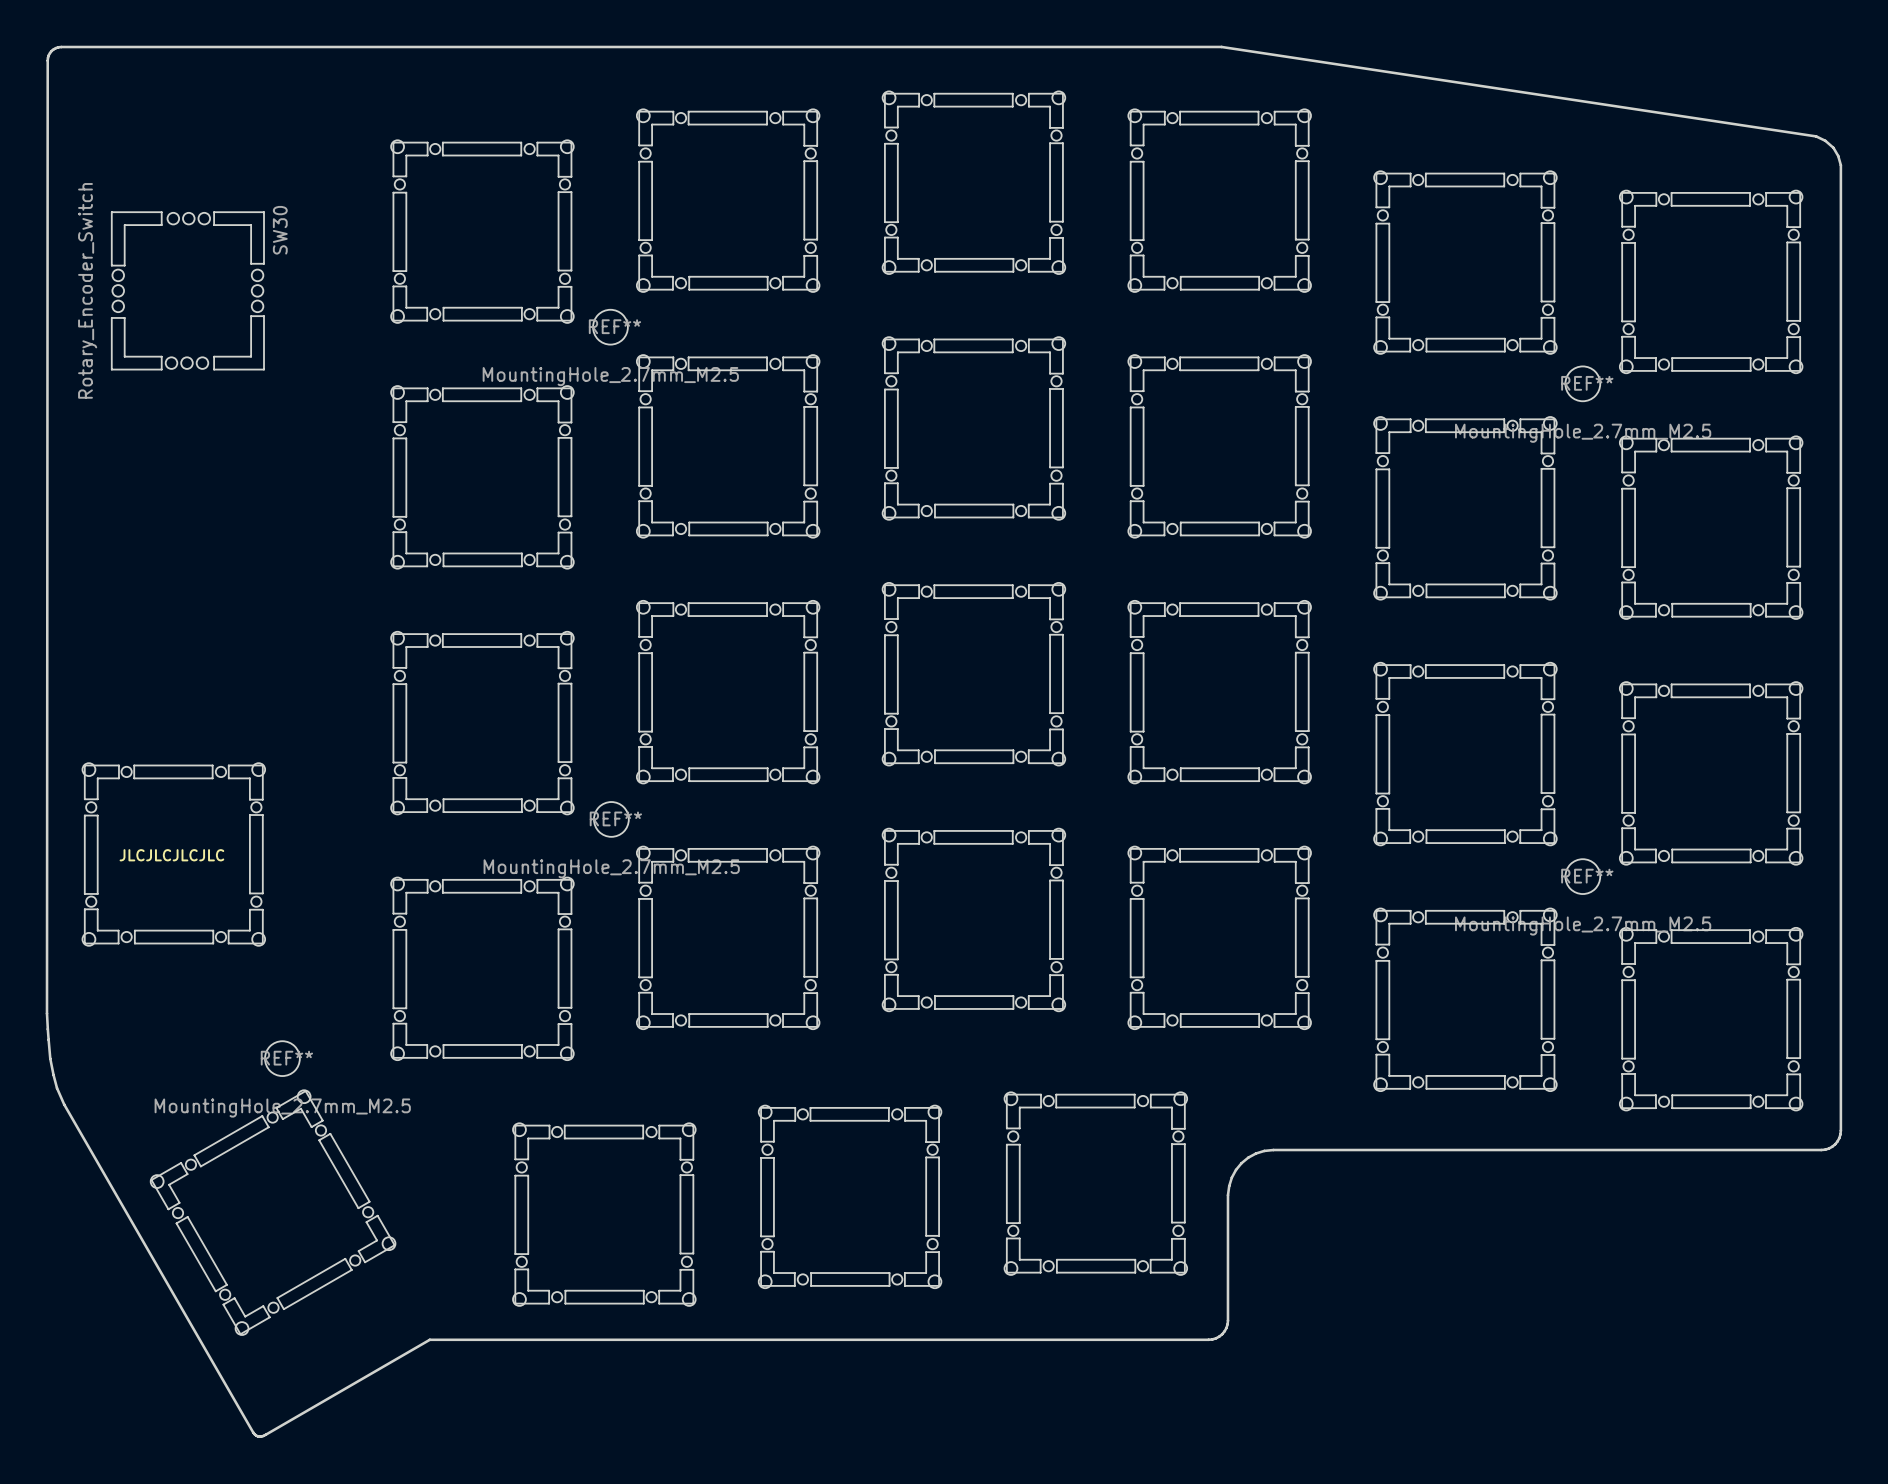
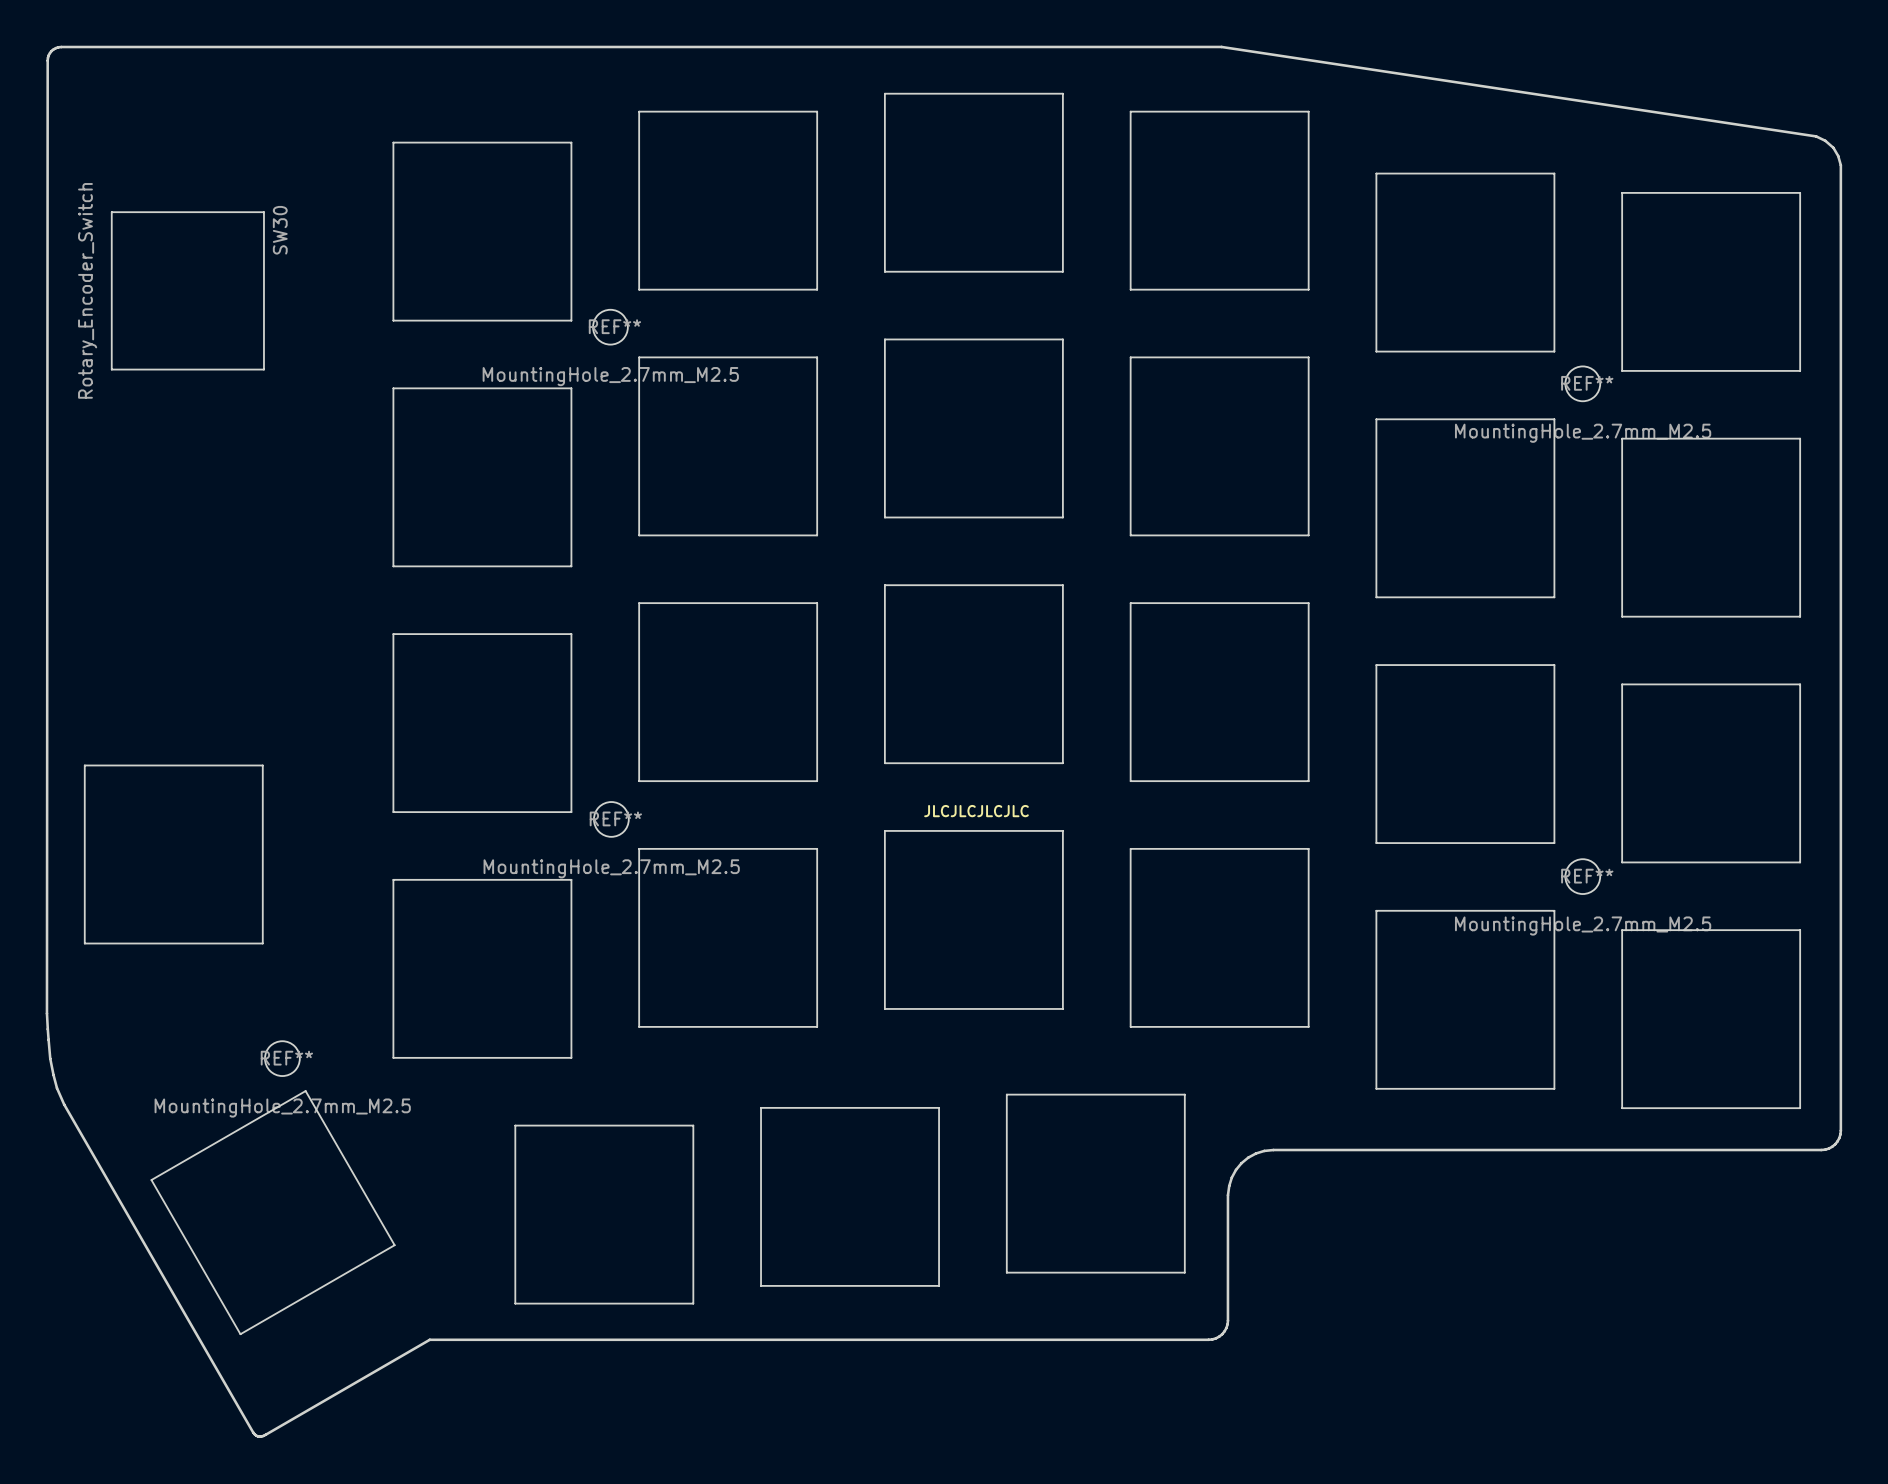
drawing: none -> [884, 93, 1064, 273]
drawing: none -> [638, 110, 818, 291]
drawing: none -> [1130, 110, 1310, 291]
drawing: none -> [392, 141, 573, 322]
drawing: none -> [1375, 172, 1556, 353]
part: (973, 182) -> none
drawing: none -> [1621, 192, 1801, 372]
part: (728, 200) -> none
part: (1219, 200) -> none
SW30 footprint: [111, 211, 265, 371] -> [110, 211, 265, 371]
part: (482, 231) -> none
part: (1465, 262) -> none
part: (1711, 281) -> none
drawing: none -> [884, 338, 1064, 519]
drawing: none -> [638, 356, 818, 537]
drawing: none -> [1130, 356, 1310, 537]
drawing: none -> [392, 387, 573, 568]
drawing: none -> [1375, 418, 1556, 598]
part: (973, 428) -> none
drawing: none -> [1621, 438, 1801, 618]
part: (728, 446) -> none
part: (1219, 446) -> none
part: (482, 477) -> none
part: (1465, 508) -> none
part: (1711, 527) -> none
drawing: none -> [884, 584, 1064, 764]
drawing: none -> [638, 602, 818, 782]
drawing: none -> [1130, 602, 1310, 782]
drawing: none -> [392, 633, 573, 813]
drawing: none -> [1375, 664, 1556, 844]
part: (973, 674) -> none
drawing: none -> [1621, 683, 1801, 864]
part: (728, 692) -> none
part: (1219, 692) -> none
part: (482, 723) -> none
part: (1465, 754) -> none
drawing: none -> [84, 764, 264, 945]
part: (1711, 773) -> none
text: none -> JLCJLCJLCJLC (976, 811)
drawing: none -> [884, 830, 1064, 1010]
drawing: none -> [638, 848, 818, 1028]
drawing: none -> [1130, 848, 1310, 1028]
part: (173, 854) -> none
text: JLCJLCJLCJLC (171, 855) -> none
drawing: none -> [392, 879, 573, 1059]
drawing: none -> [1375, 910, 1556, 1090]
part: (973, 919) -> none
drawing: none -> [1621, 929, 1801, 1109]
part: (728, 937) -> none
part: (1219, 937) -> none
part: (482, 968) -> none
part: (1465, 999) -> none
part: (1711, 1019) -> none
drawing: none -> [150, 1090, 396, 1335]
drawing: none -> [1006, 1093, 1186, 1274]
drawing: none -> [760, 1107, 940, 1287]
drawing: none -> [514, 1124, 694, 1305]
part: (1095, 1183) -> none
part: (850, 1196) -> none
part: (273, 1212) -> none
part: (604, 1214) -> none

